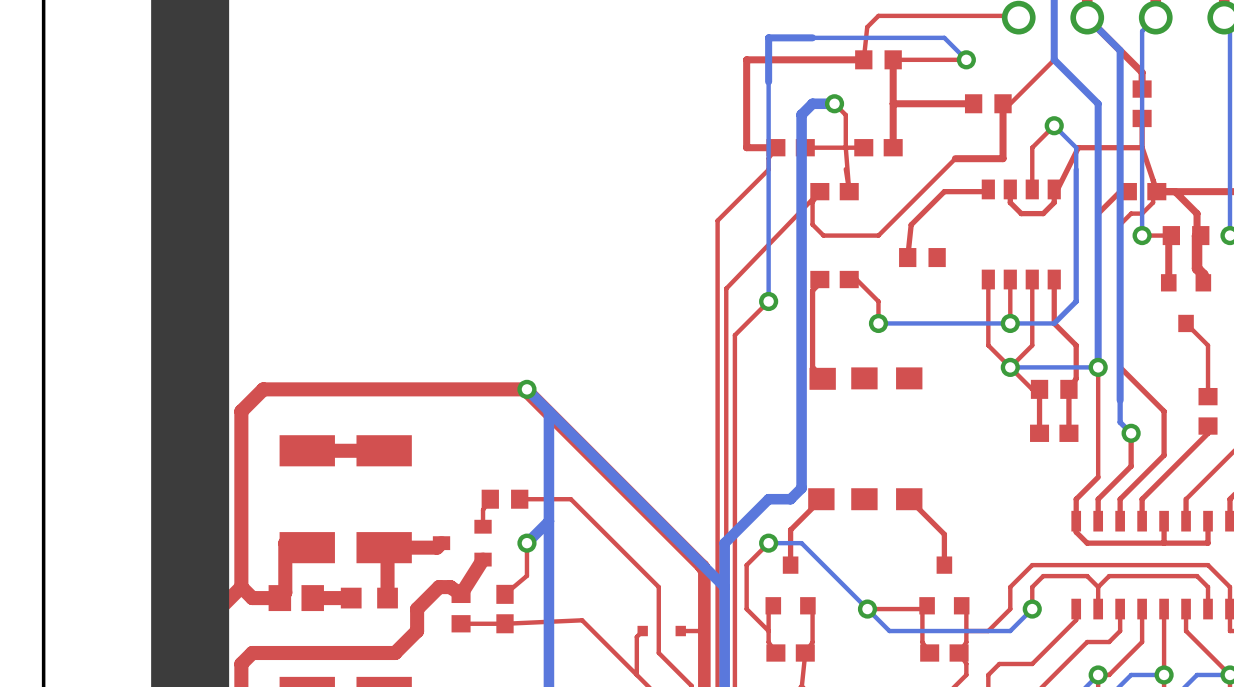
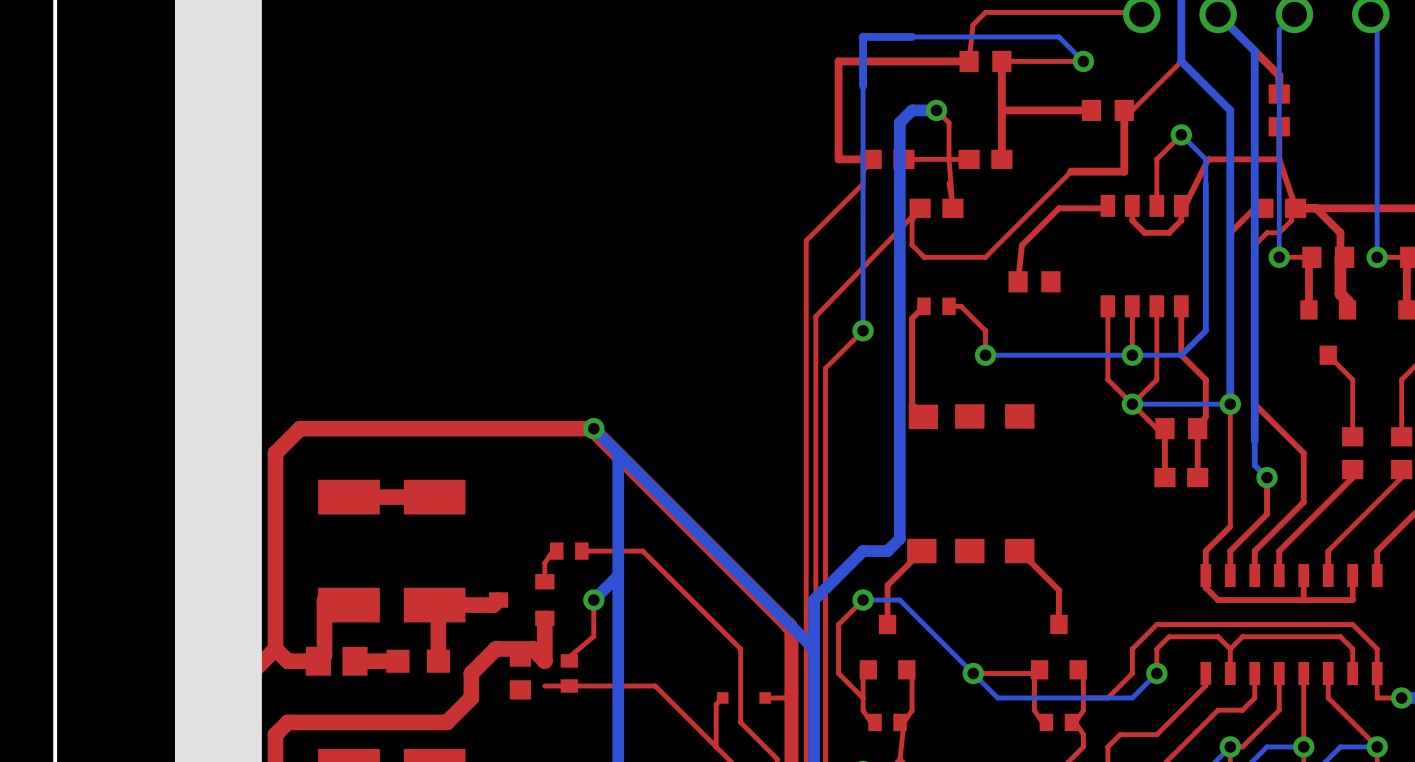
part footprint: [810, 270, 859, 289] -> [917, 297, 956, 315]
part footprint: [481, 489, 529, 509] -> [550, 542, 589, 560]
top track: (483, 559) (461, 594) (450, 587) -> (544, 618) (544, 660) (532, 649) (508, 649)
part footprint: [496, 584, 514, 634] -> [560, 654, 578, 693]
top track: (582, 620) (461, 623) -> (655, 686) (544, 686)
part footprint: [766, 644, 815, 662] -> [868, 713, 907, 732]
part footprint: [920, 644, 969, 662] -> [1039, 713, 1079, 732]

